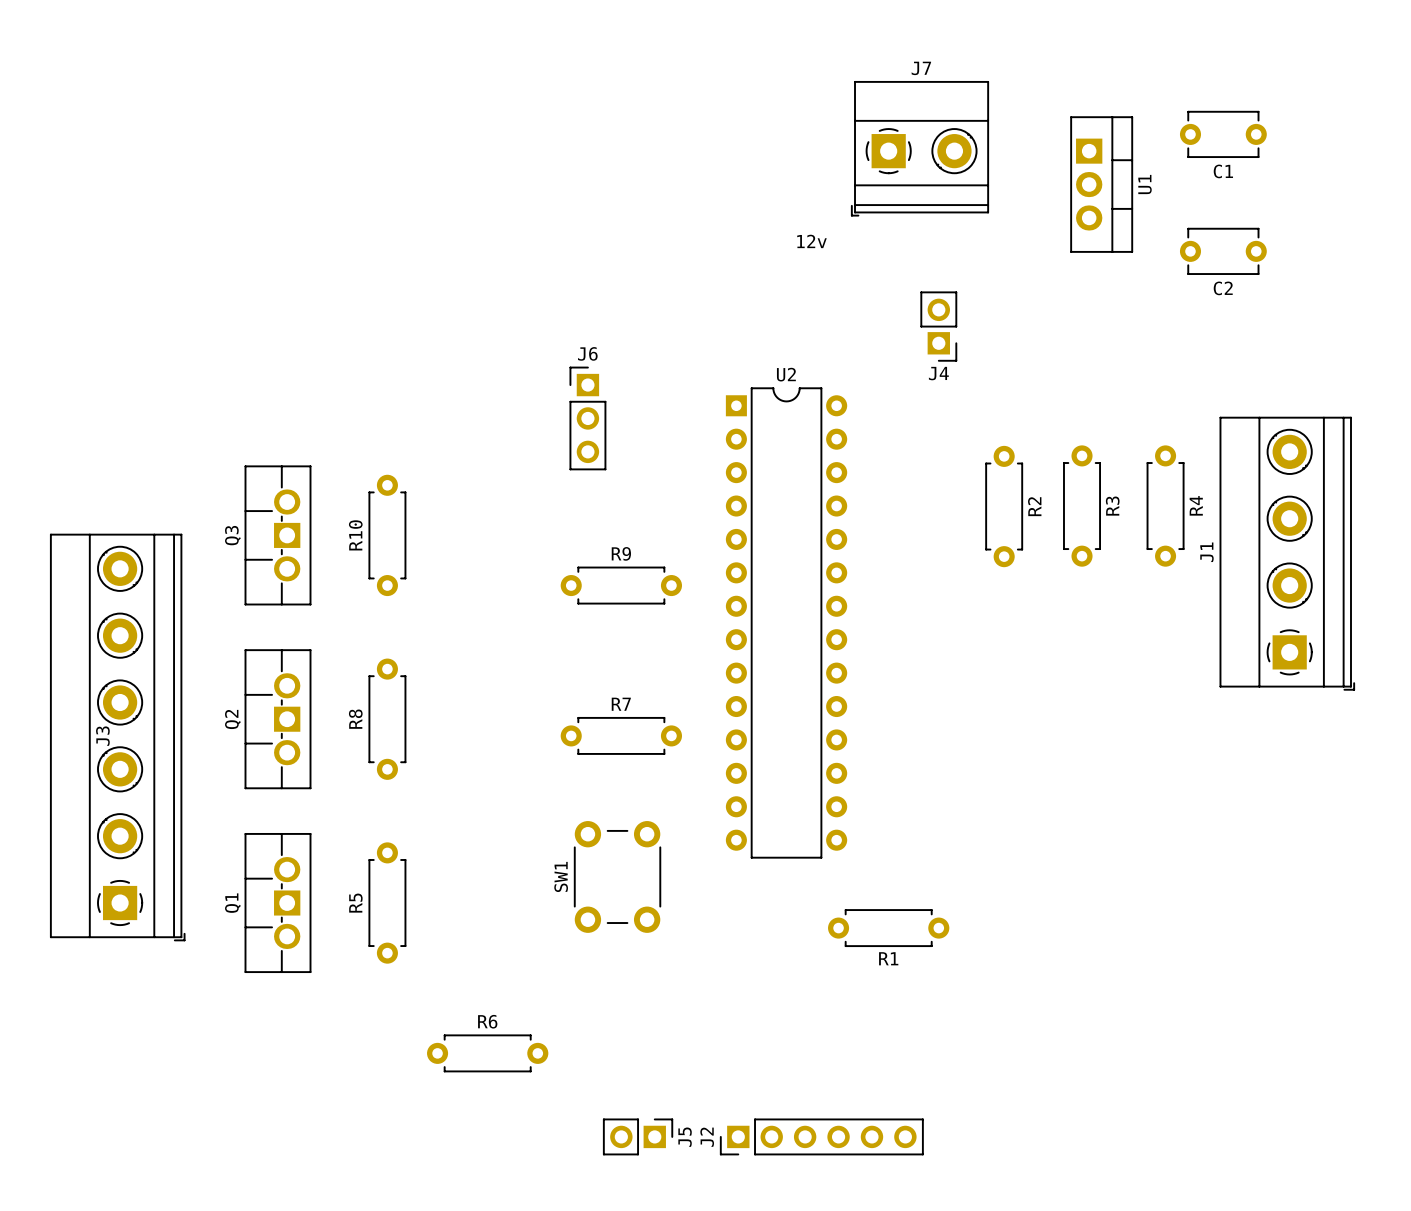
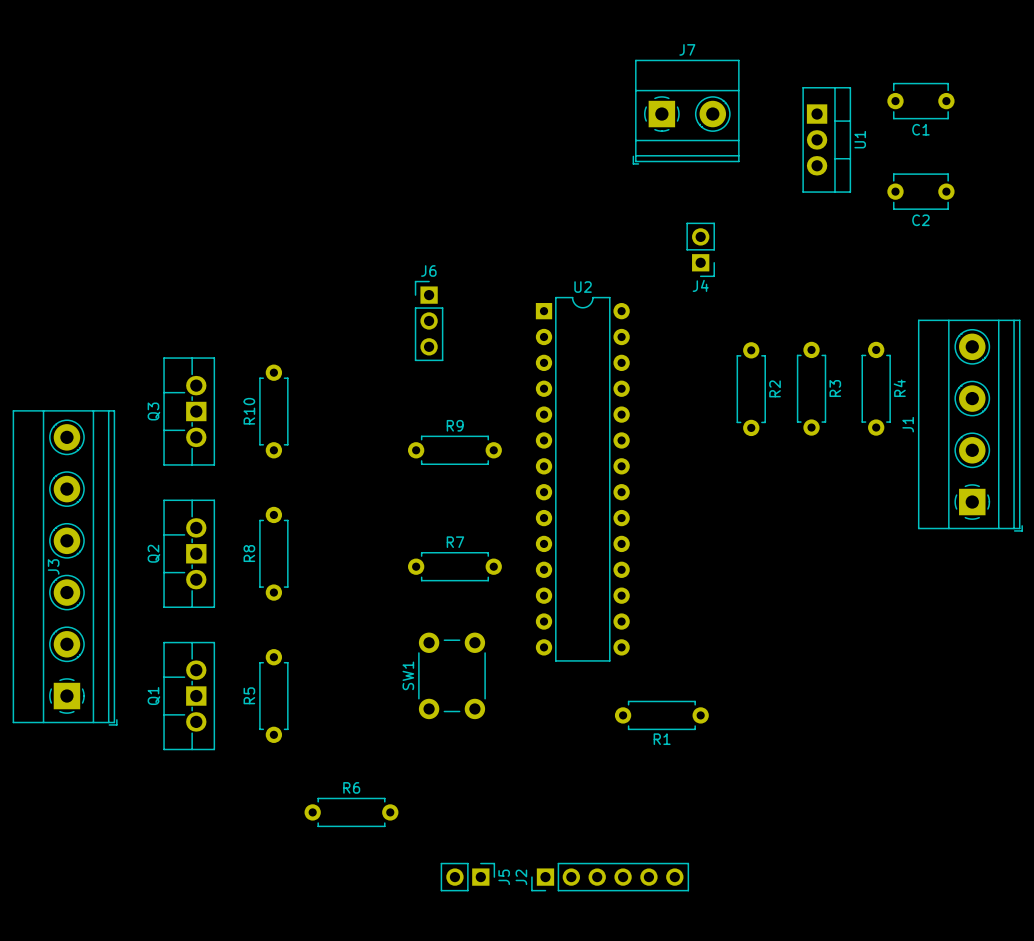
text: 12v (811, 241) -> none

